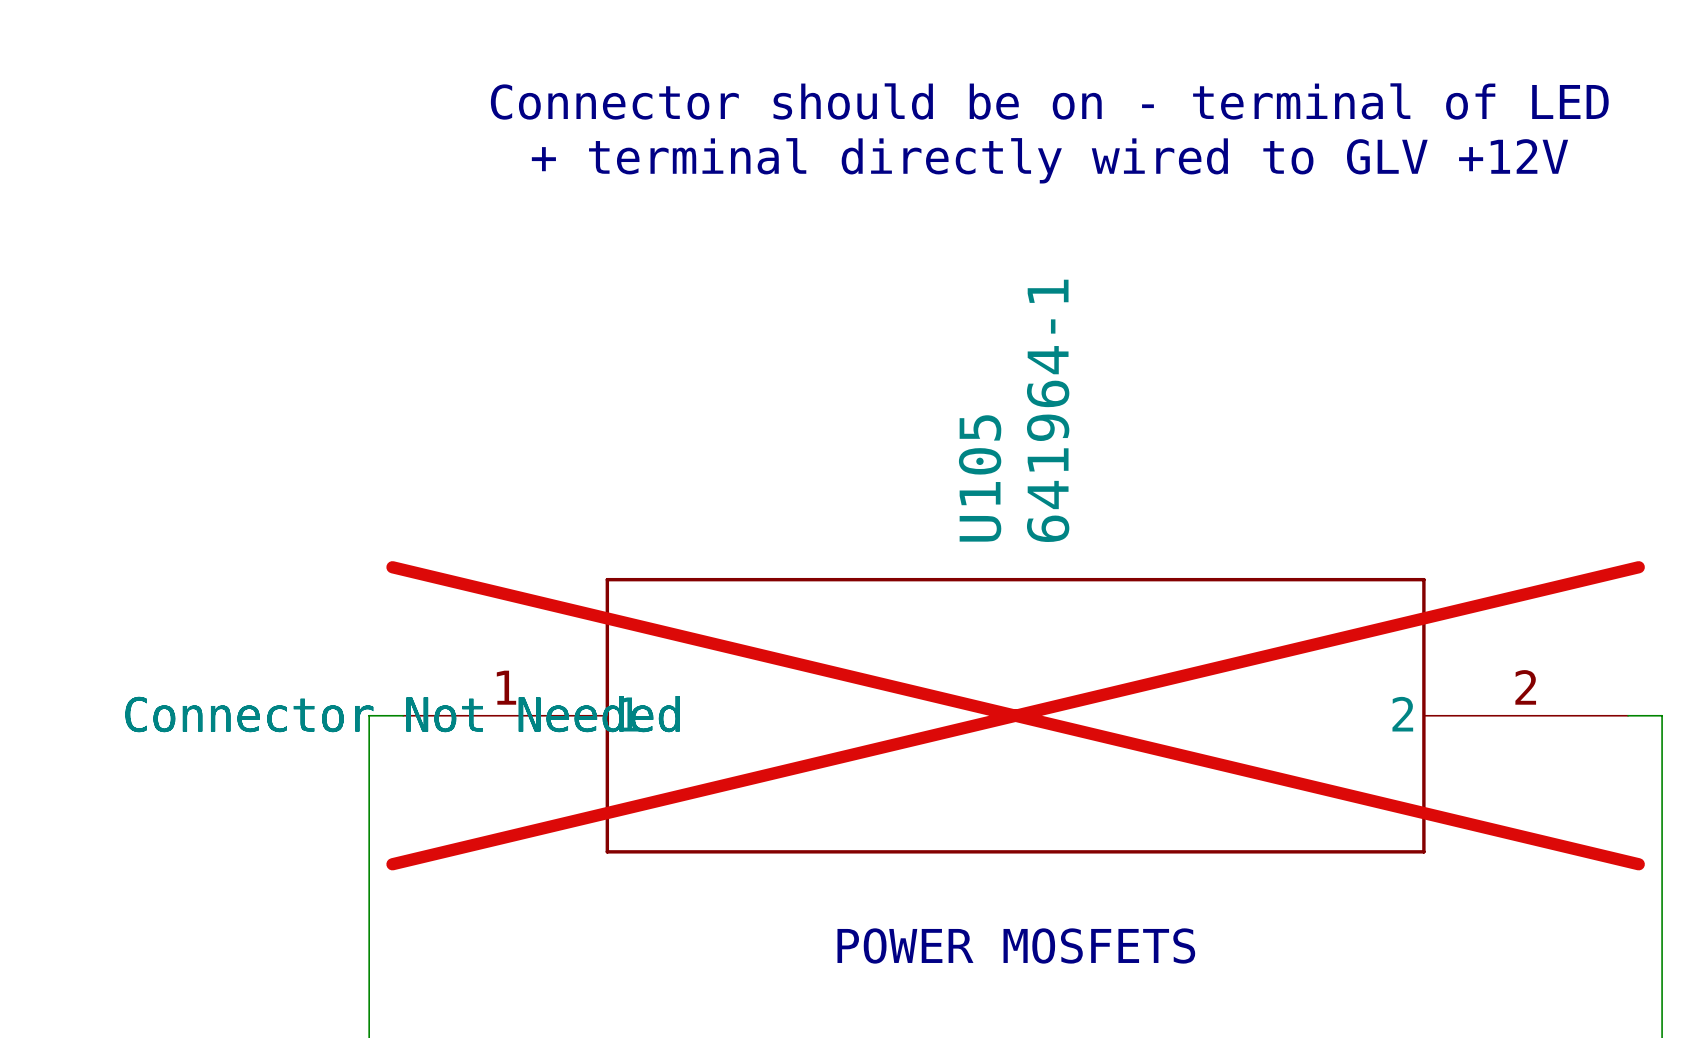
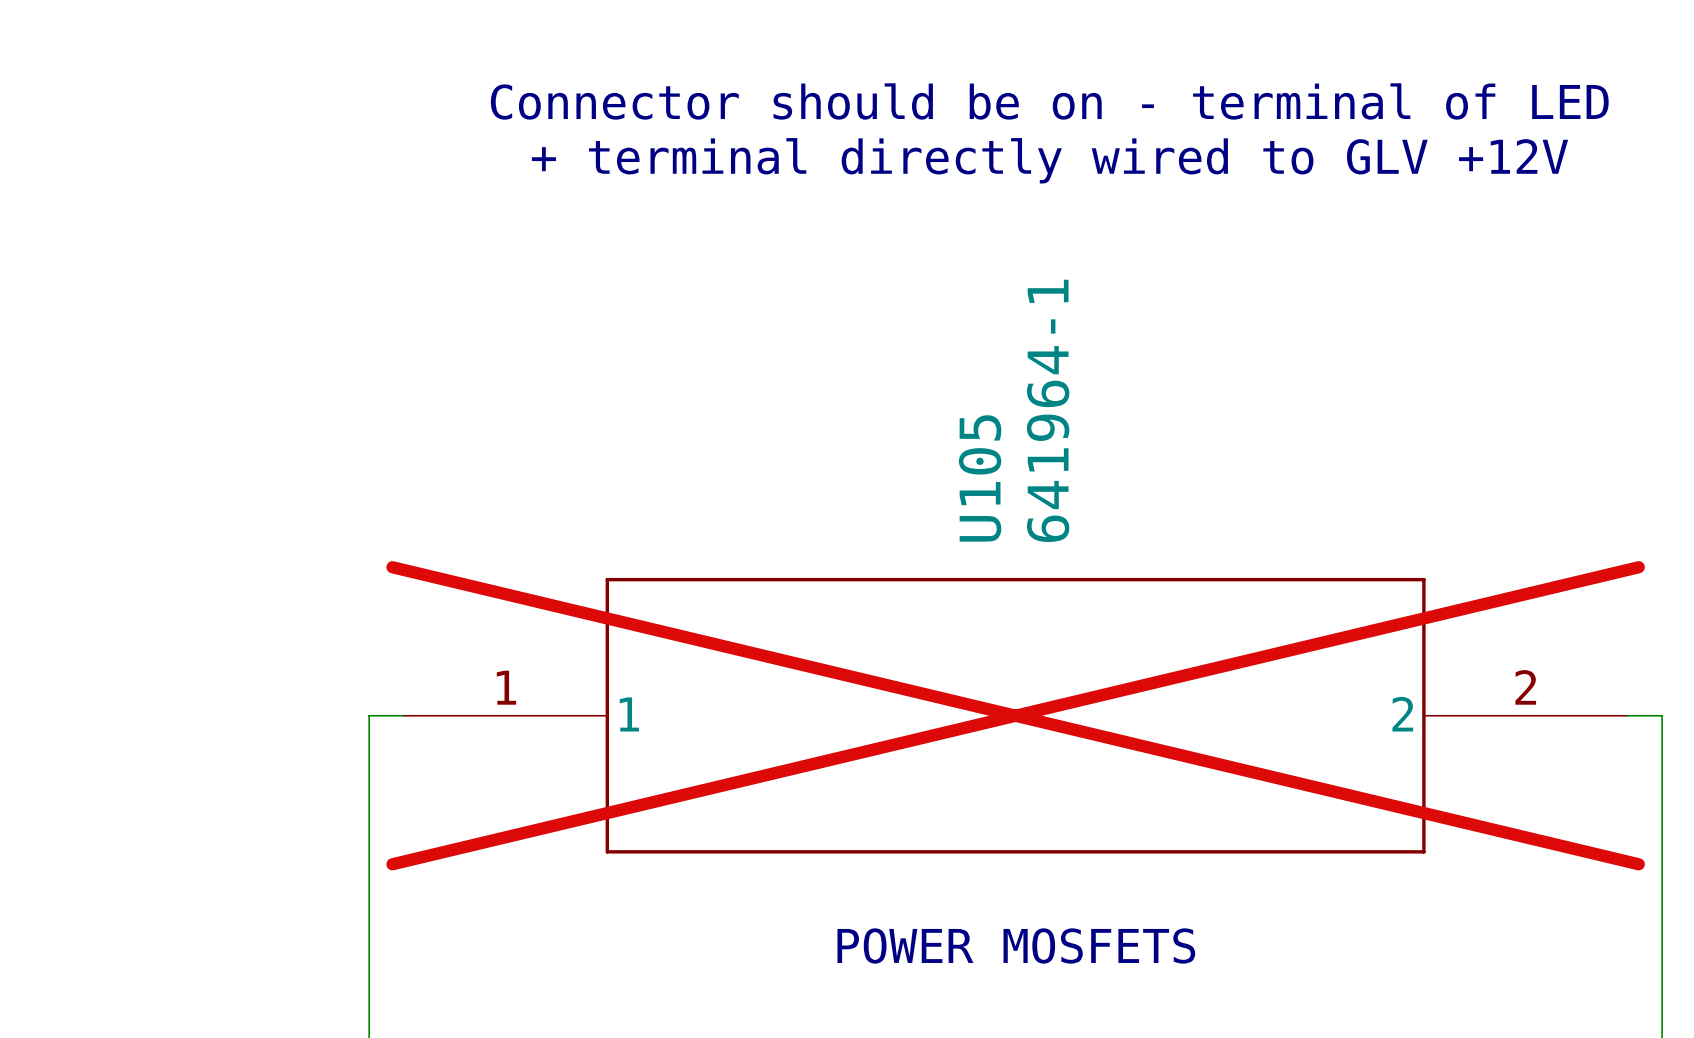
U105 text: Connector Not Needed (402, 714) -> none
U105 text: Connector Not Needed (402, 714) -> none

